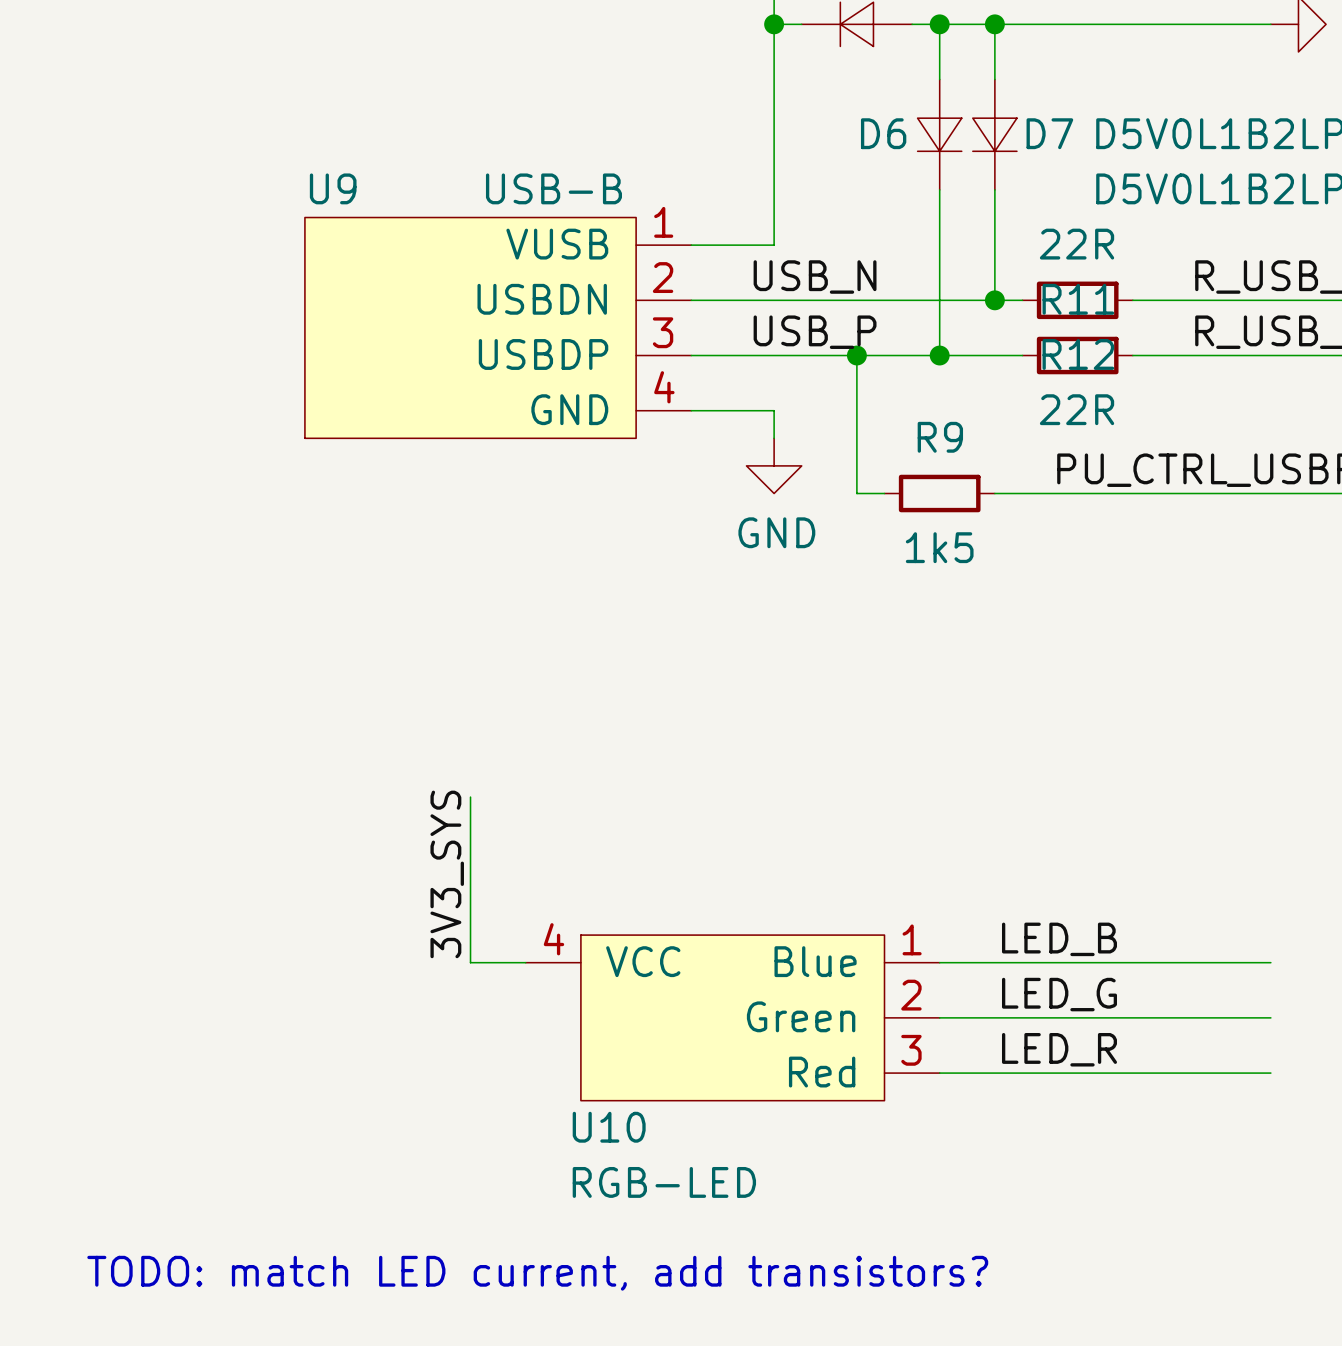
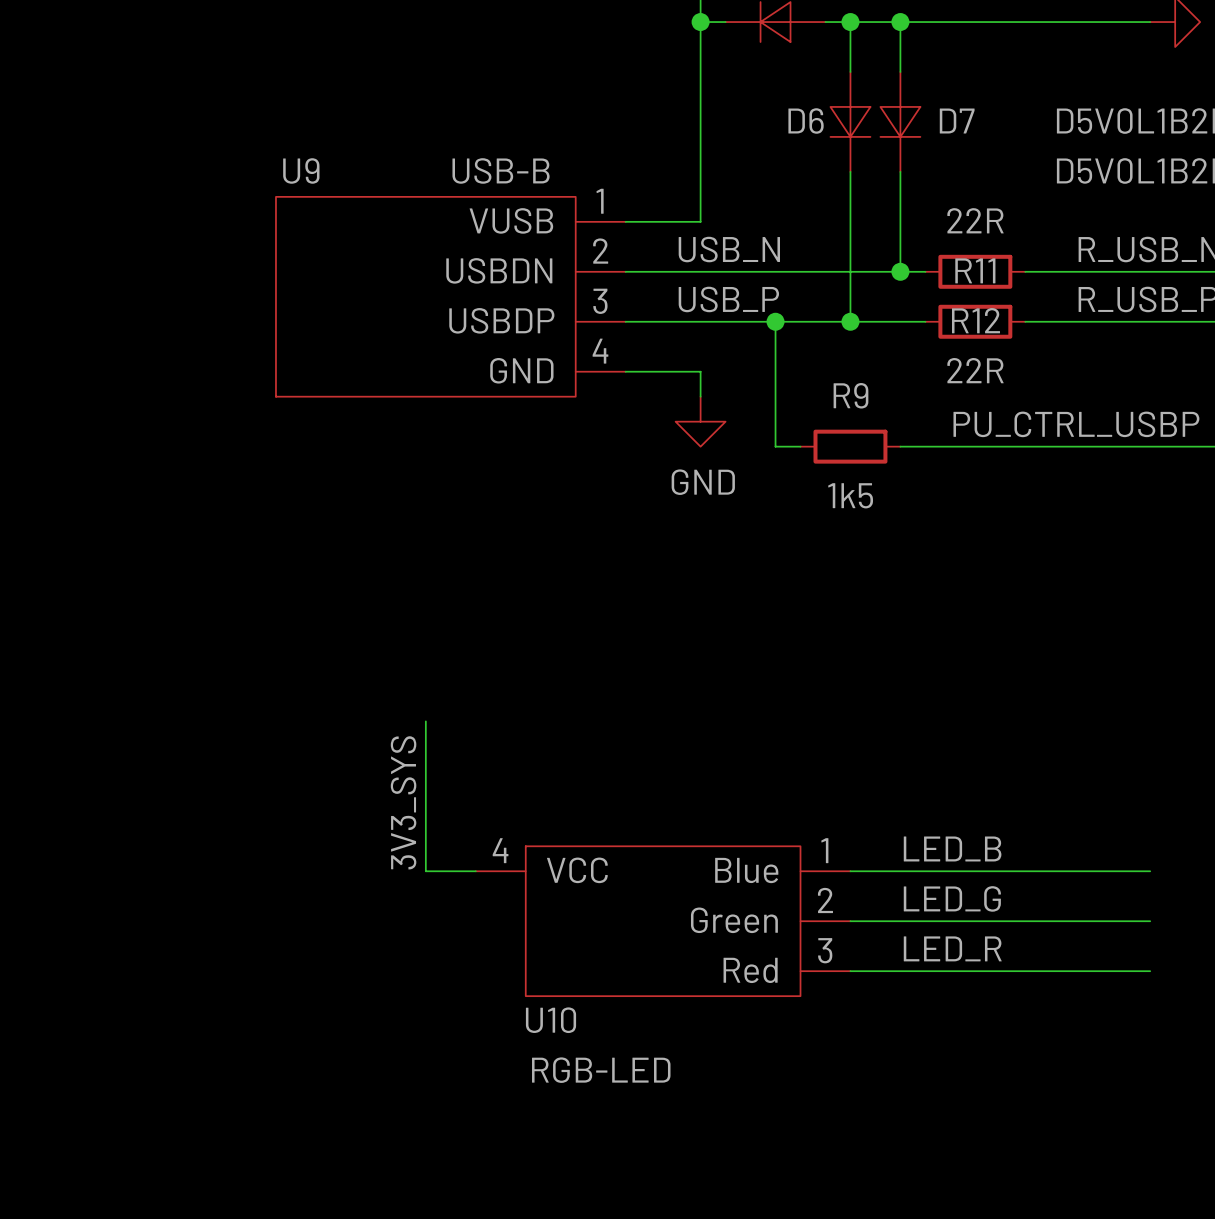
text: TODO: match LED current, add transistors? (537, 1273) -> none

